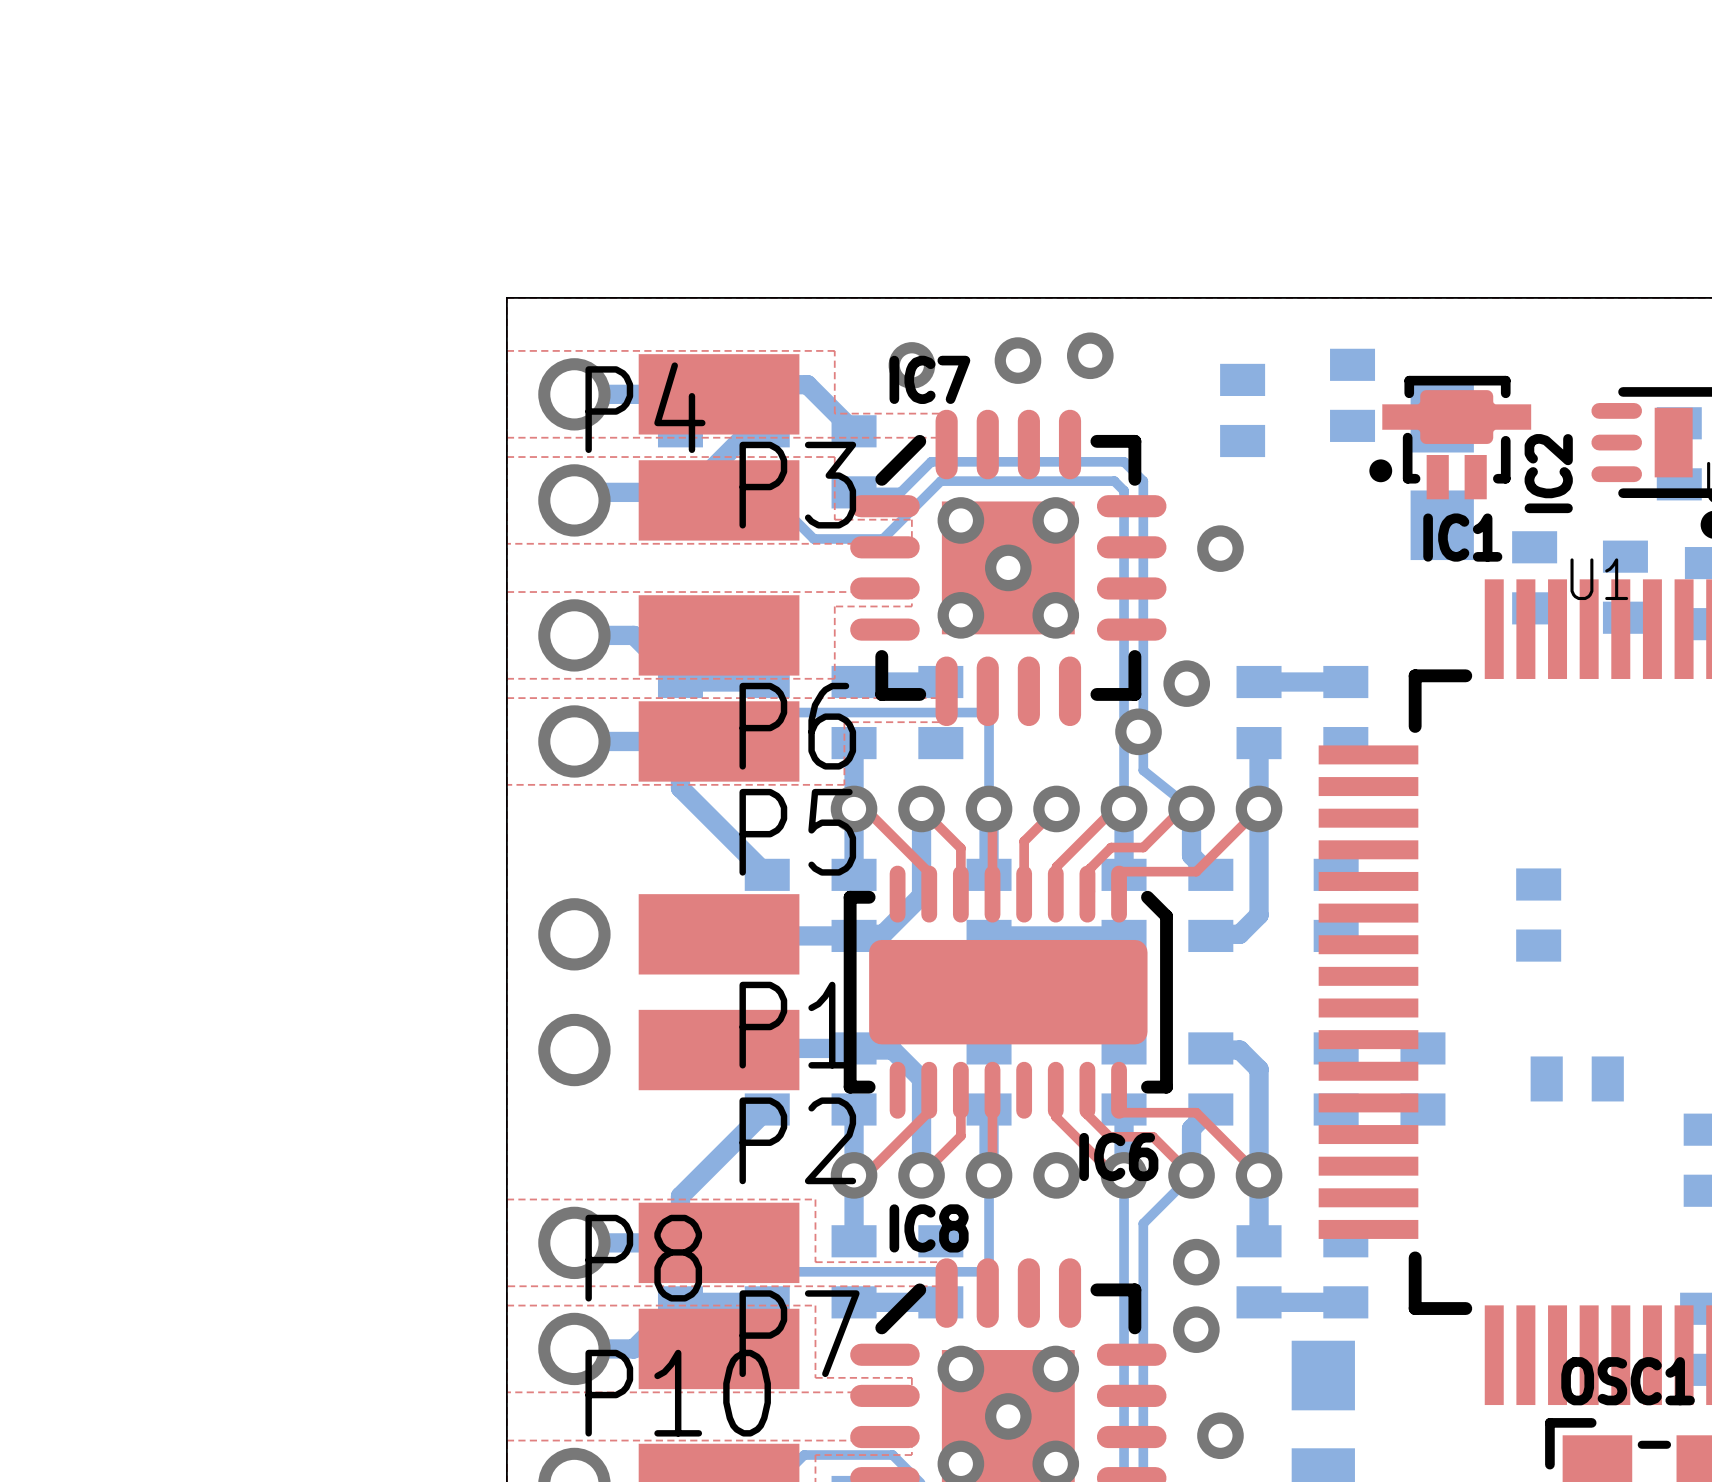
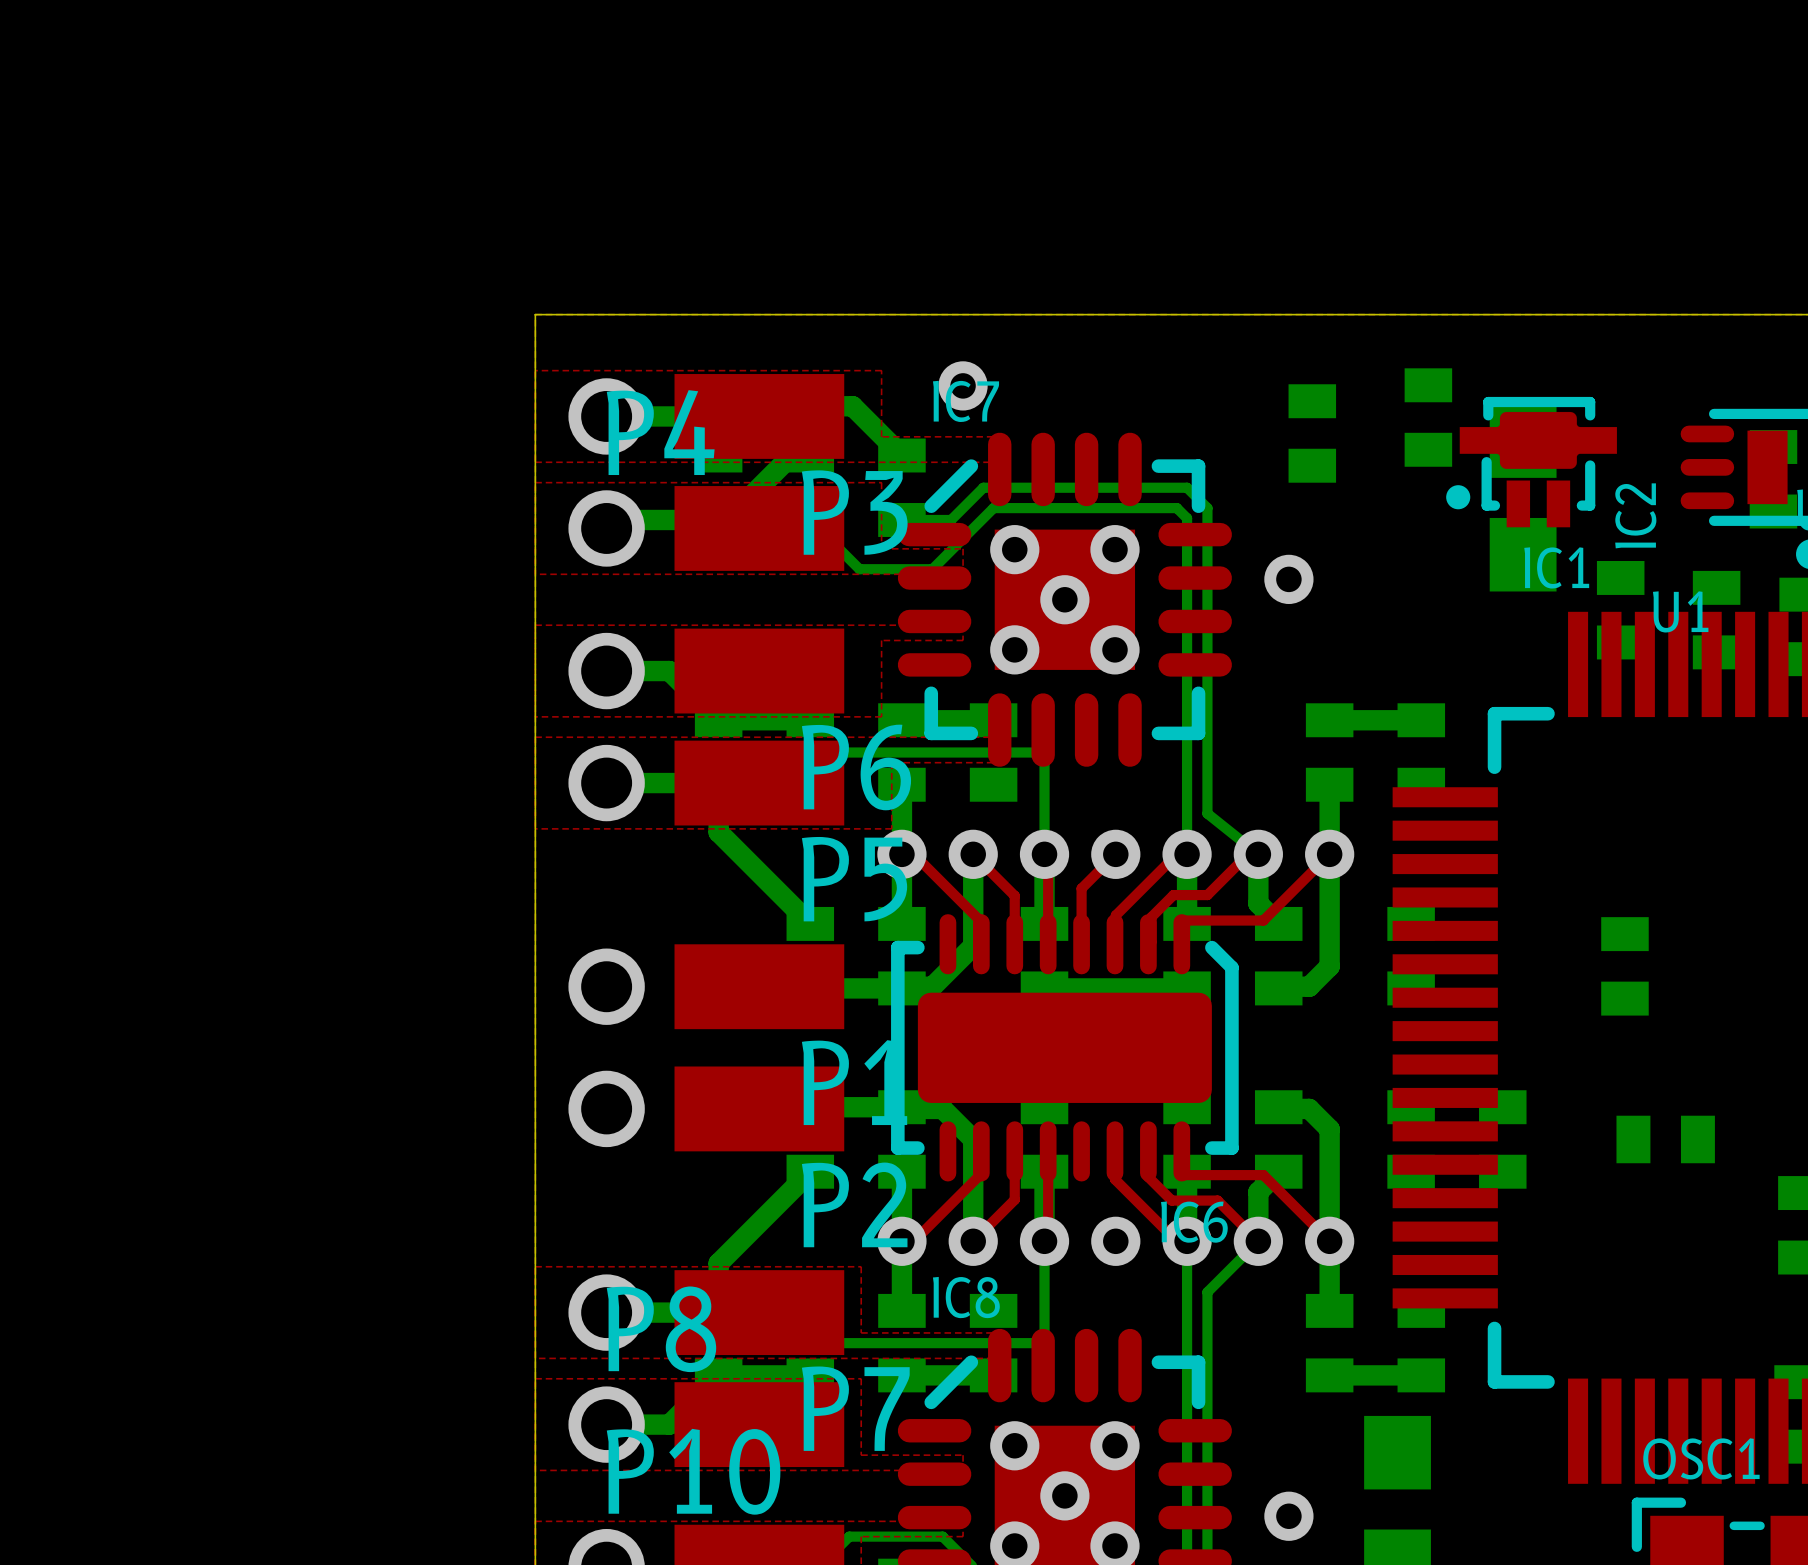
via: (1090, 355) -> none
via: (1017, 360) -> none
via: (1186, 683) -> none
via: (1138, 731) -> none
via: (1196, 1262) -> none
via: (1196, 1329) -> none

